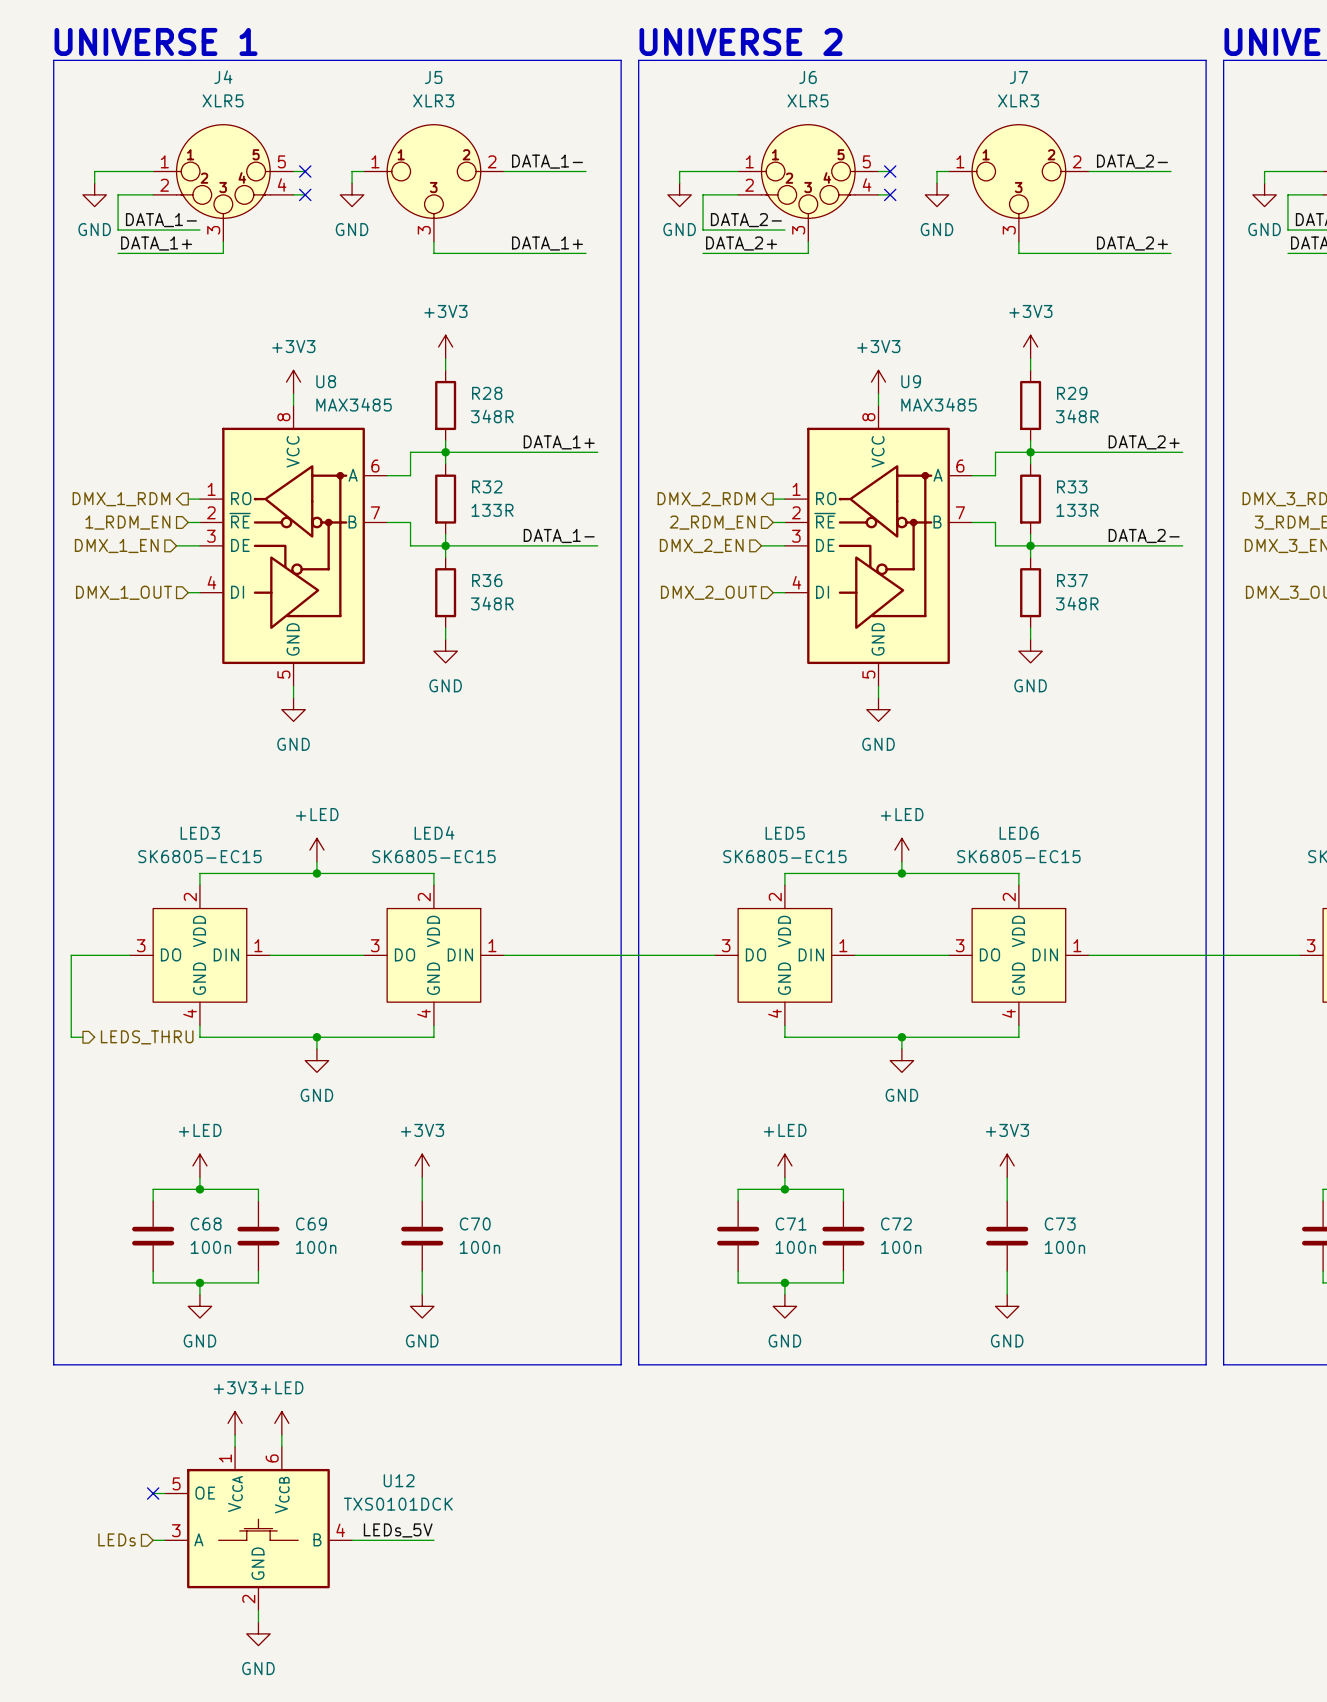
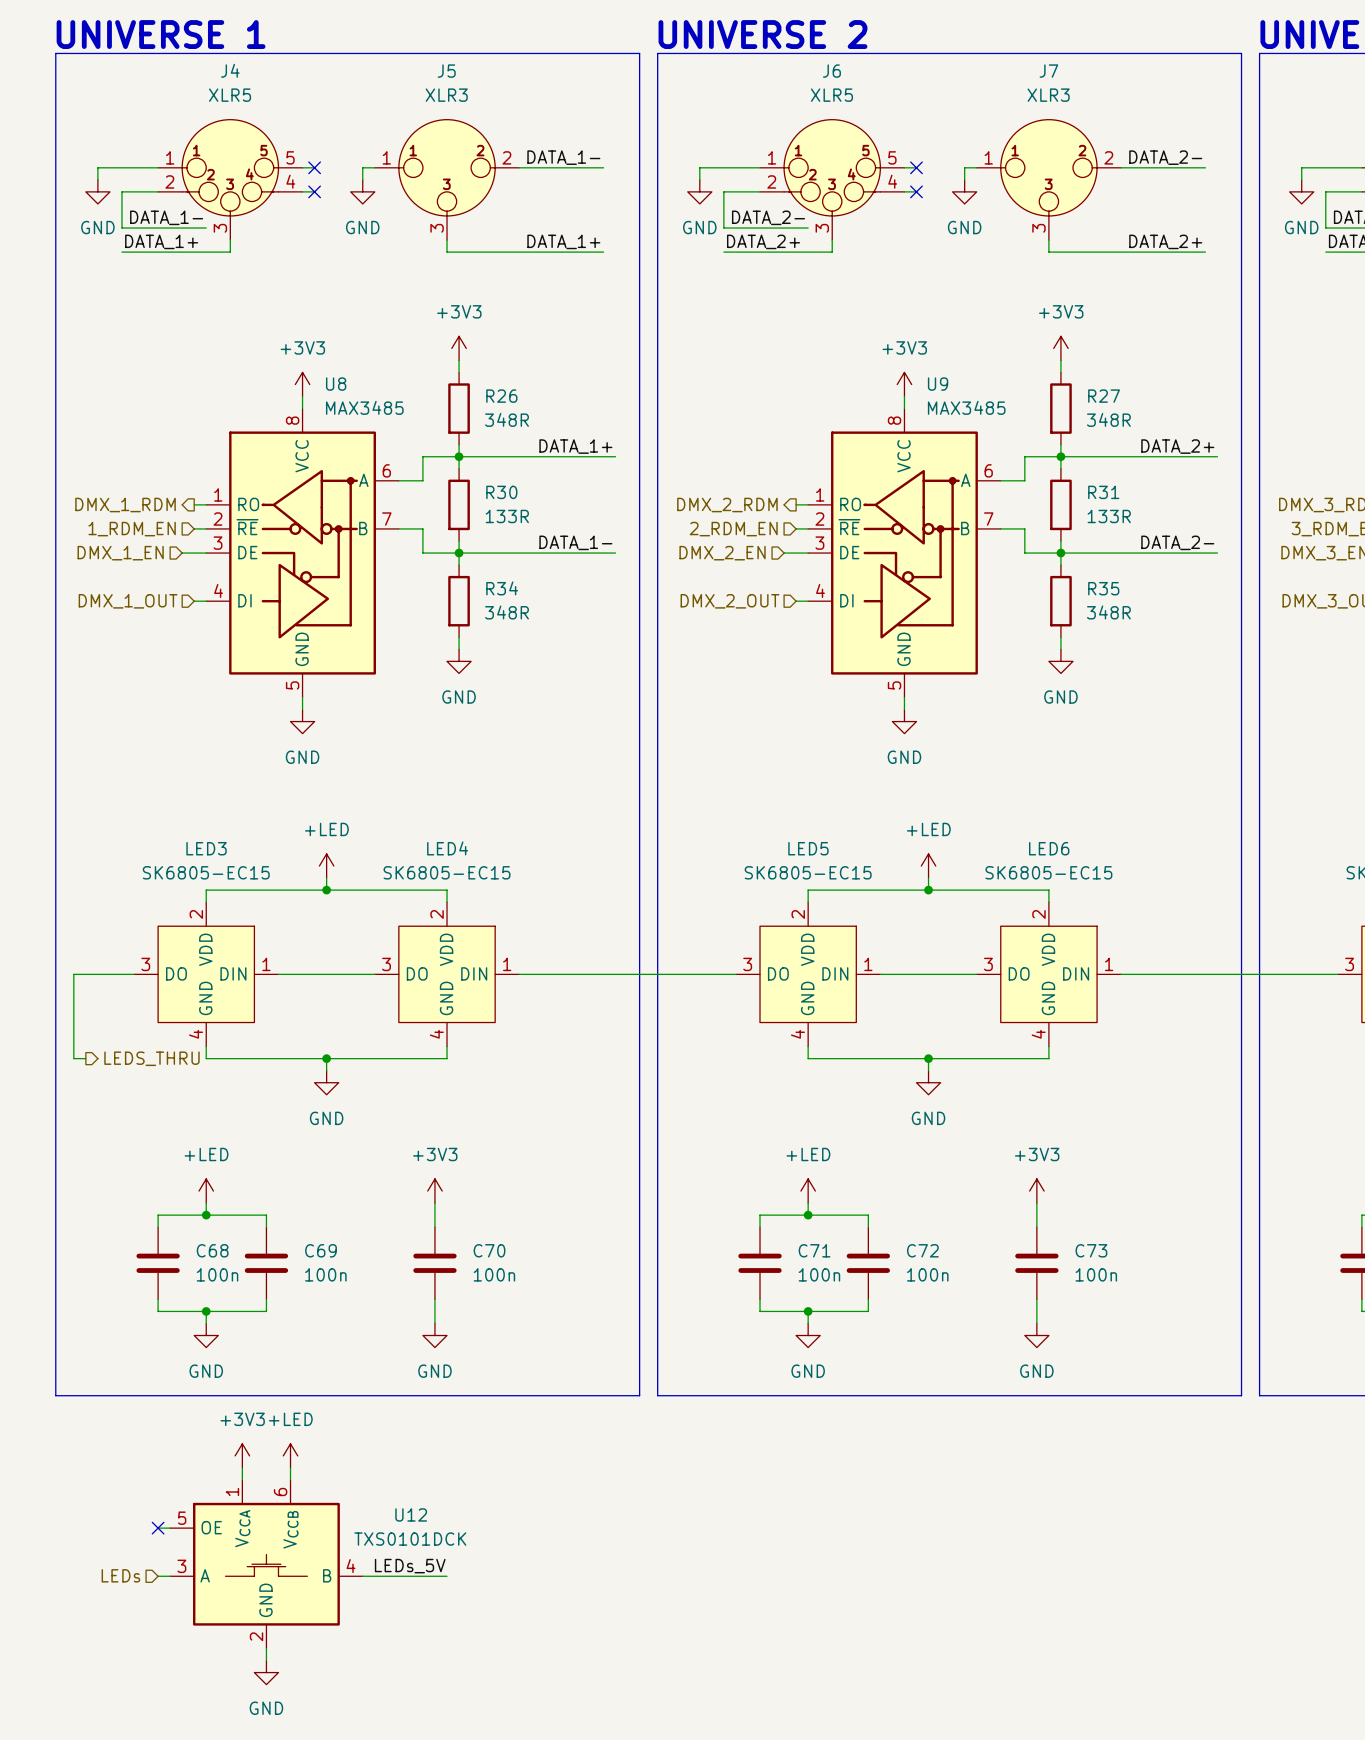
R28 name: R28 (487, 393) -> R26 (501, 396)
R29 name: R29 (1072, 393) -> R27 (1104, 396)
R32 name: R32 (487, 486) -> R30 (501, 492)
R33 name: R33 (1072, 486) -> R31 (1103, 492)
R36 name: R36 (487, 580) -> R34 (502, 588)
R37 name: R37 (1072, 580) -> R35 (1103, 588)

